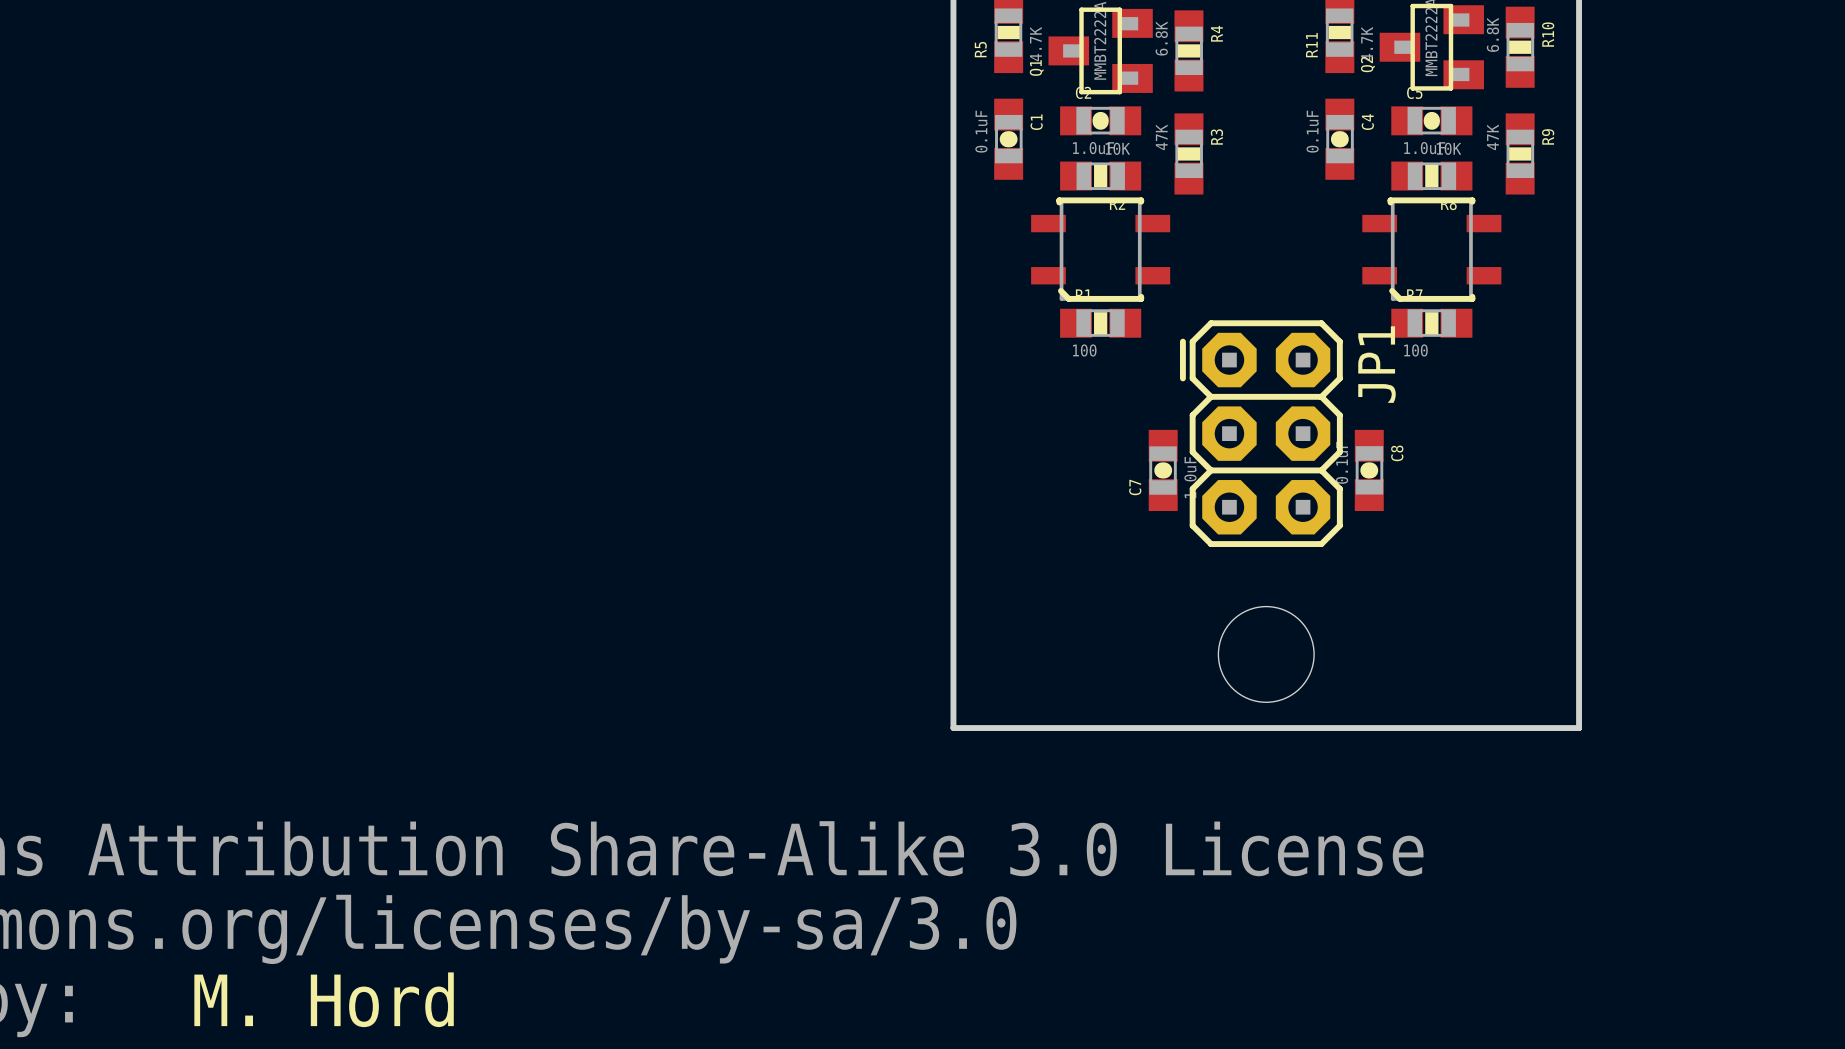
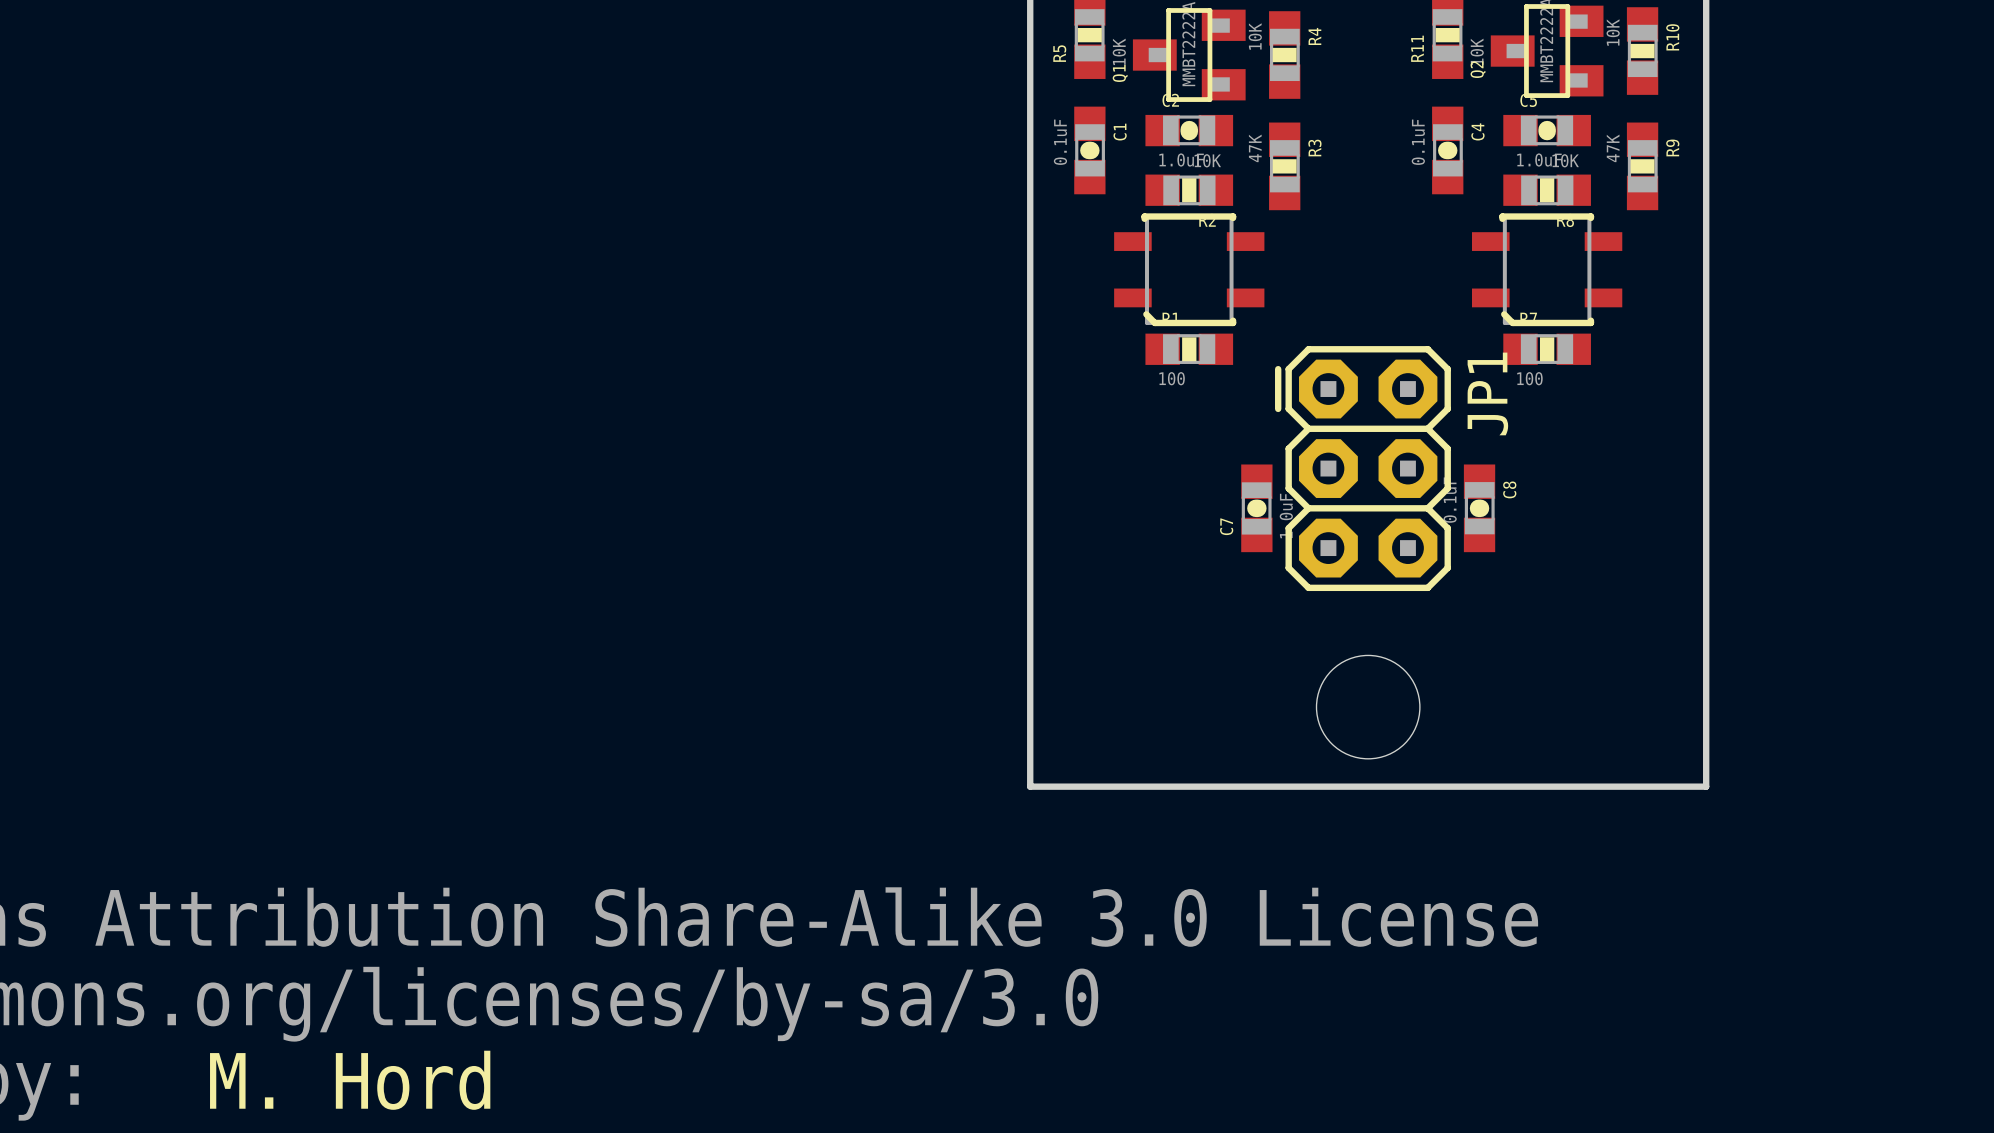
R10 value: 6.8K (1492, 34) -> 10K (1613, 32)
R4 value: 6.8K (1161, 38) -> 10K (1255, 36)
R5 value: 4.7K (1035, 44) -> 10K (1119, 51)
R11 value: 4.7K (1367, 44) -> 10K (1477, 51)

